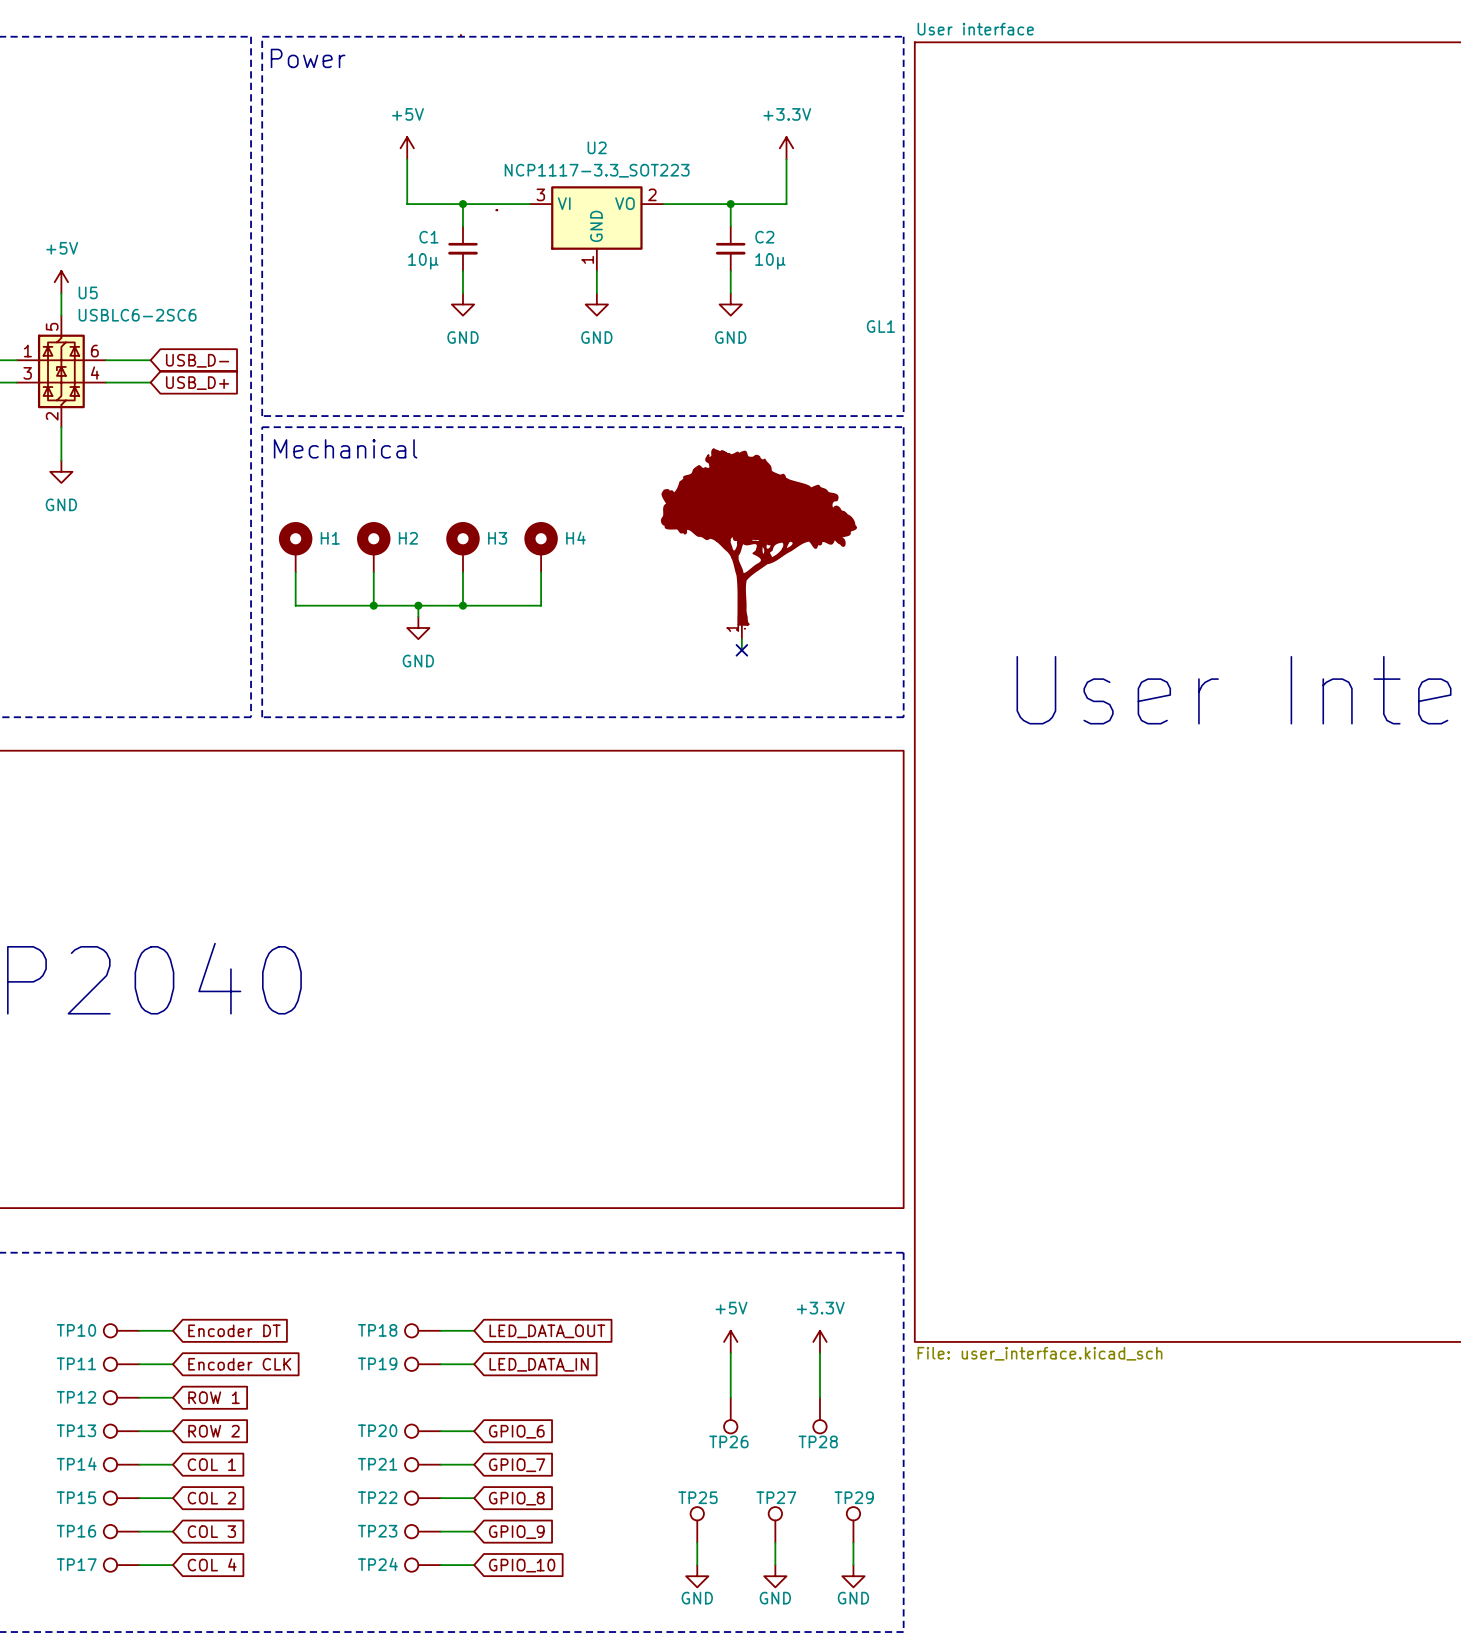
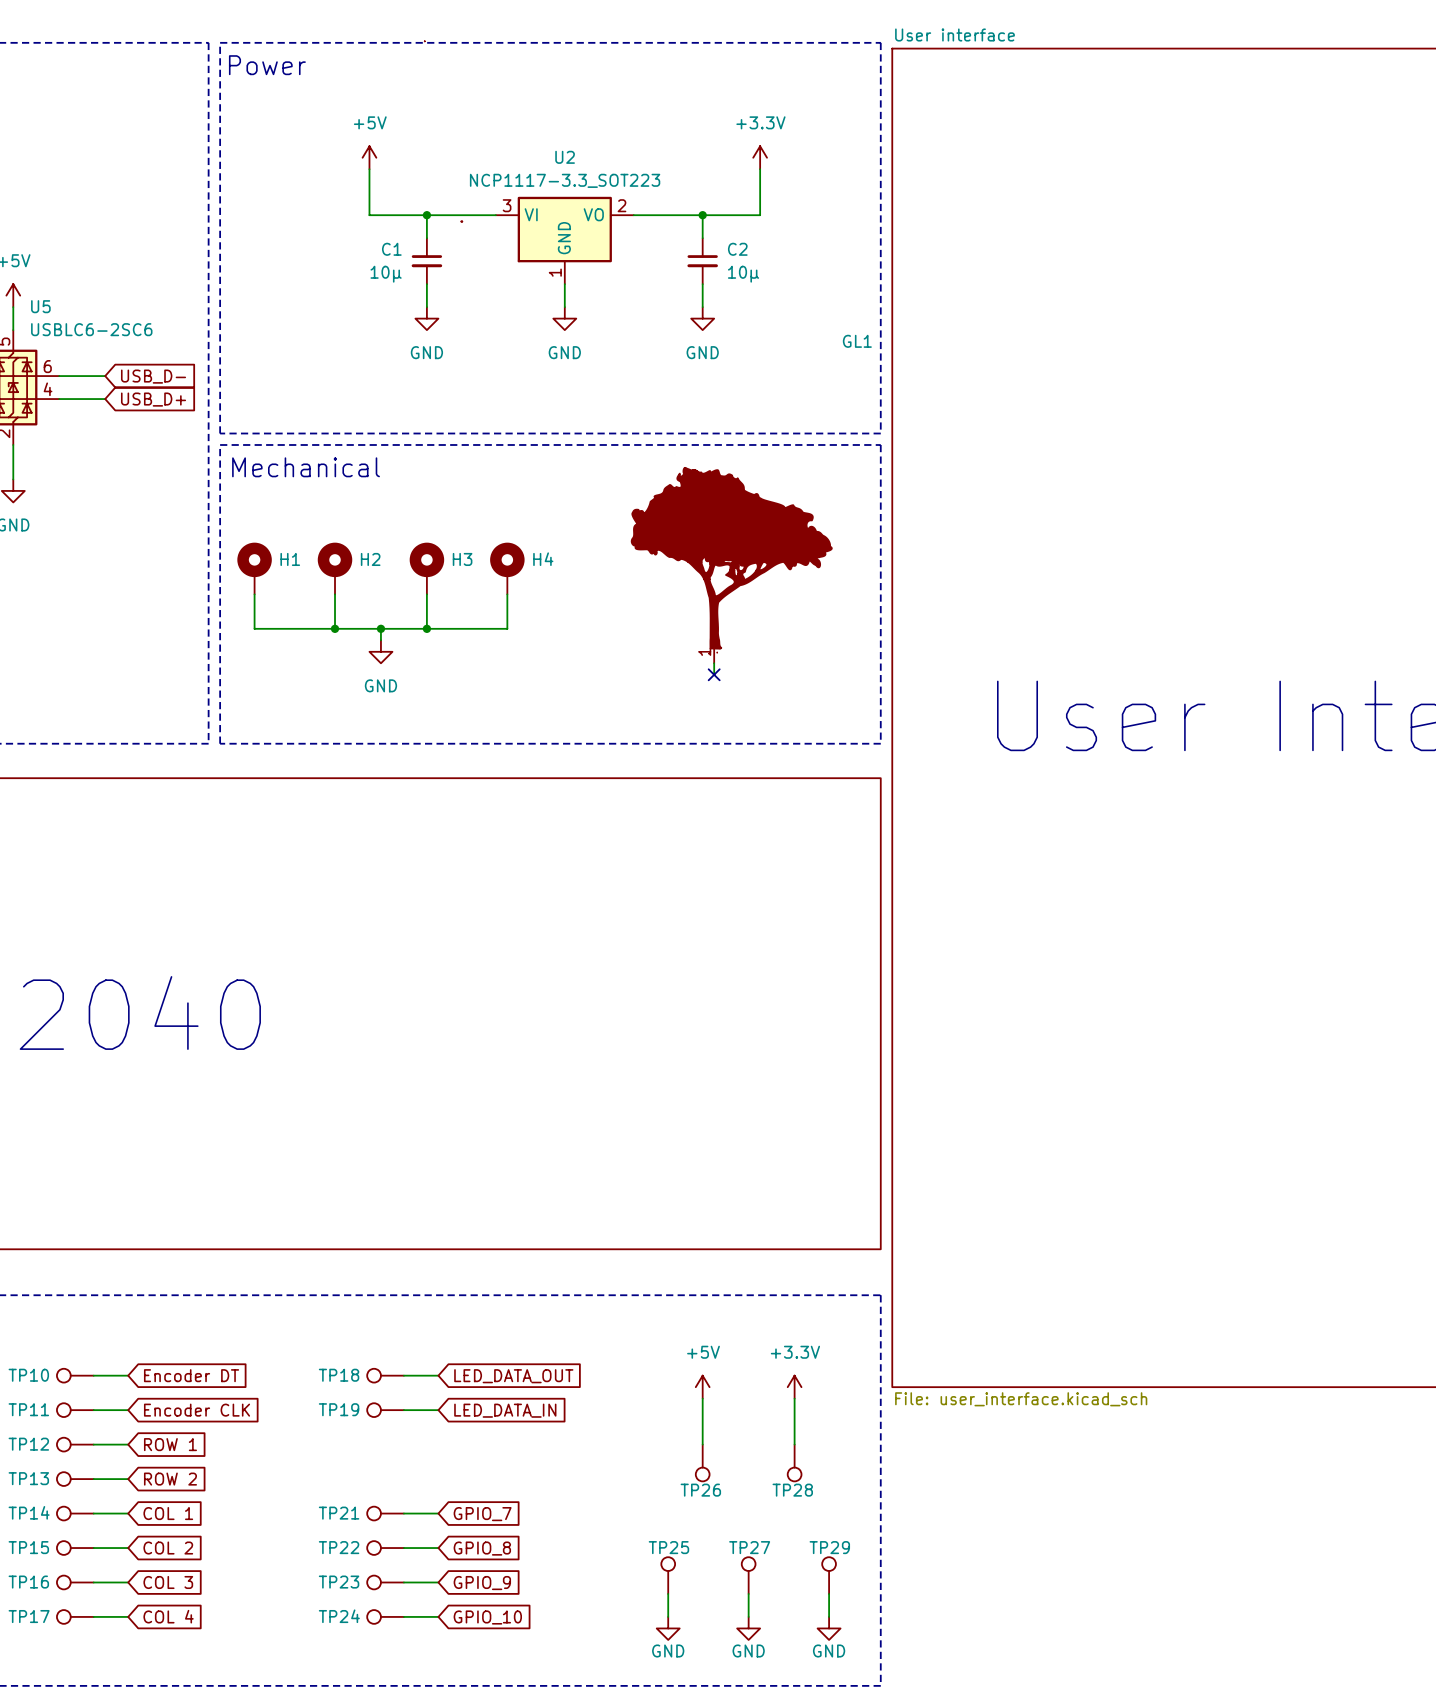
TP20: (422, 1431) -> none
wire: (440, 1431) (474, 1431) -> none
global label: GPIO_6 (516, 1431) -> none

